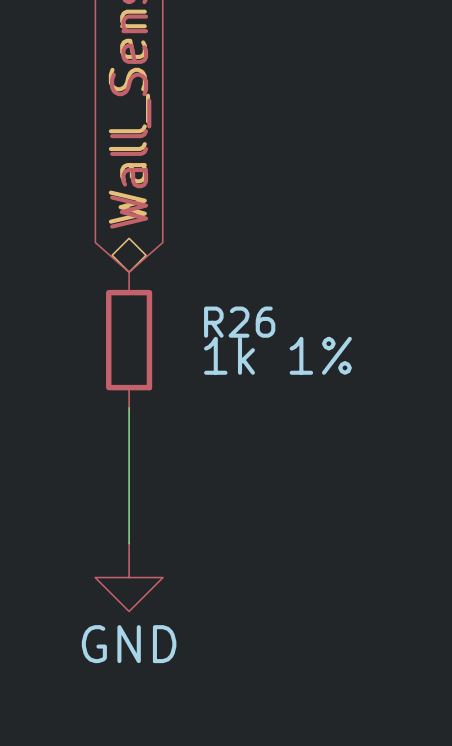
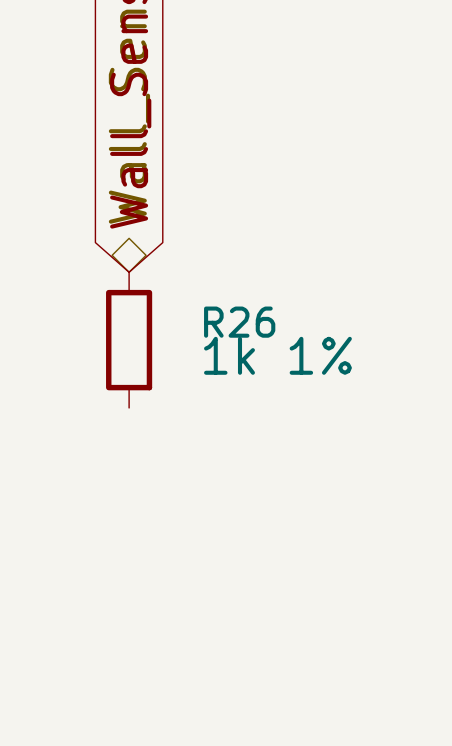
wire: (129, 407) (129, 543) -> none
power symbol: GND (129, 577) -> none

